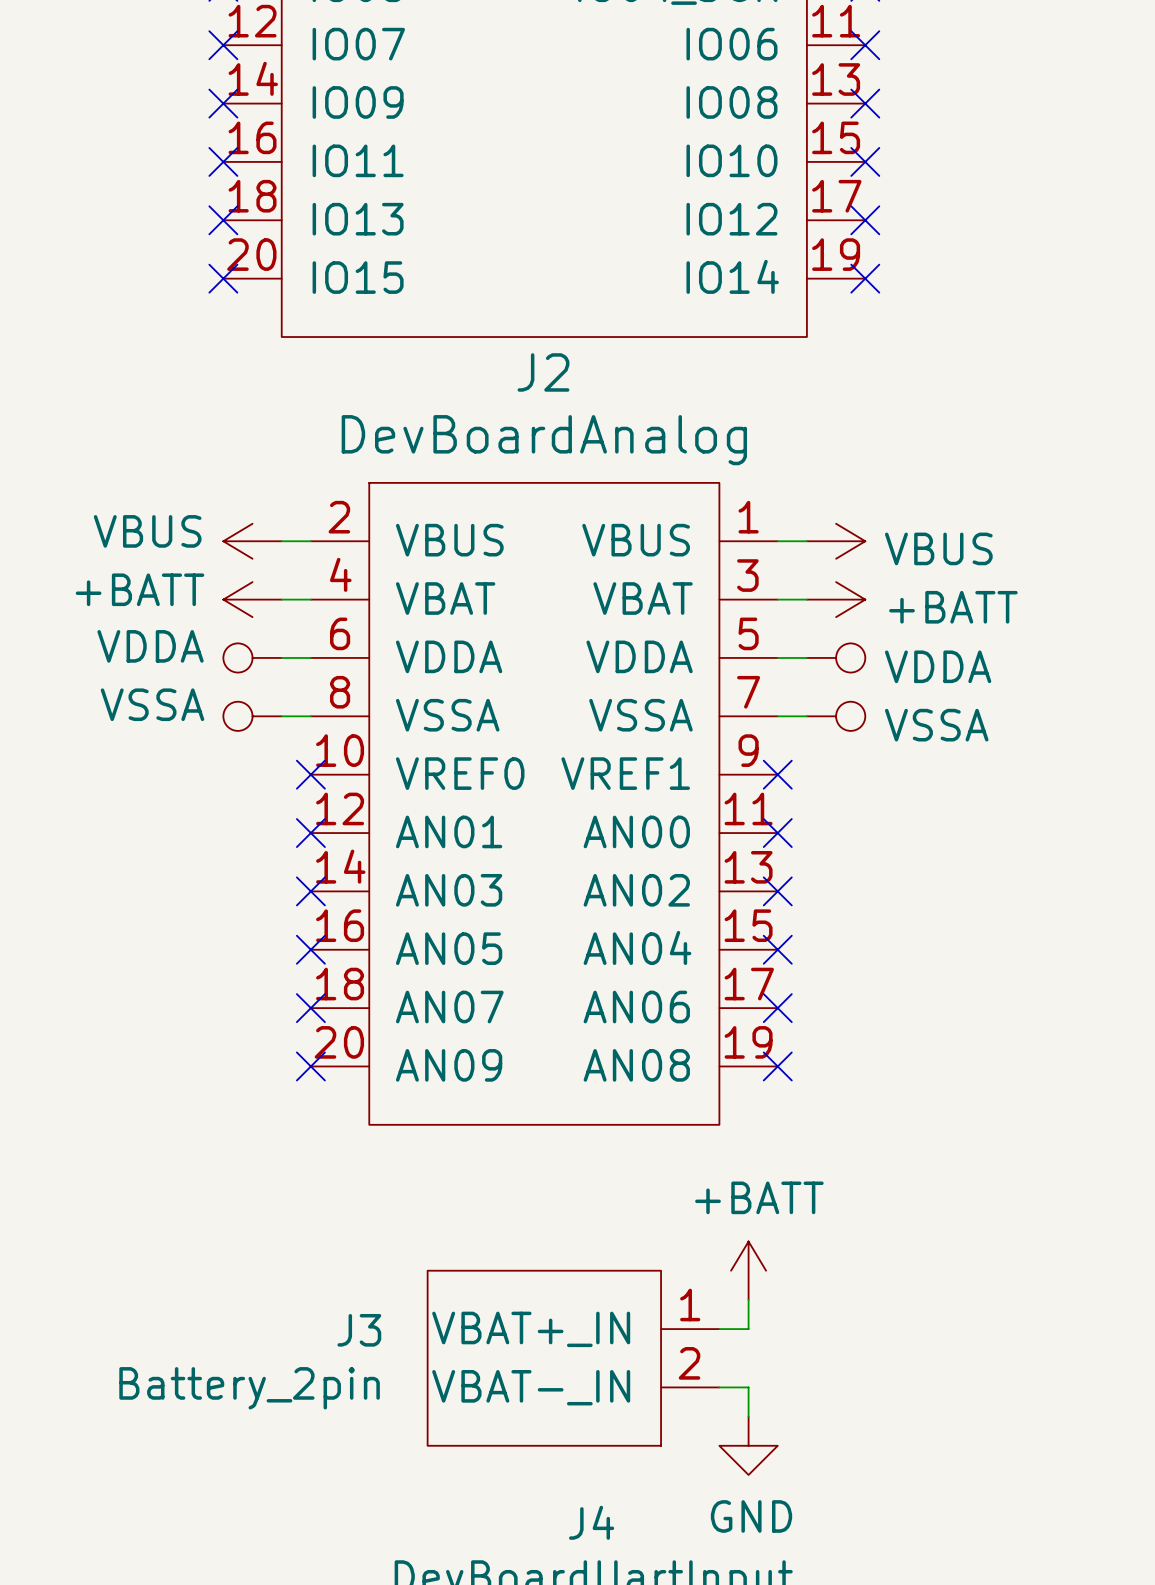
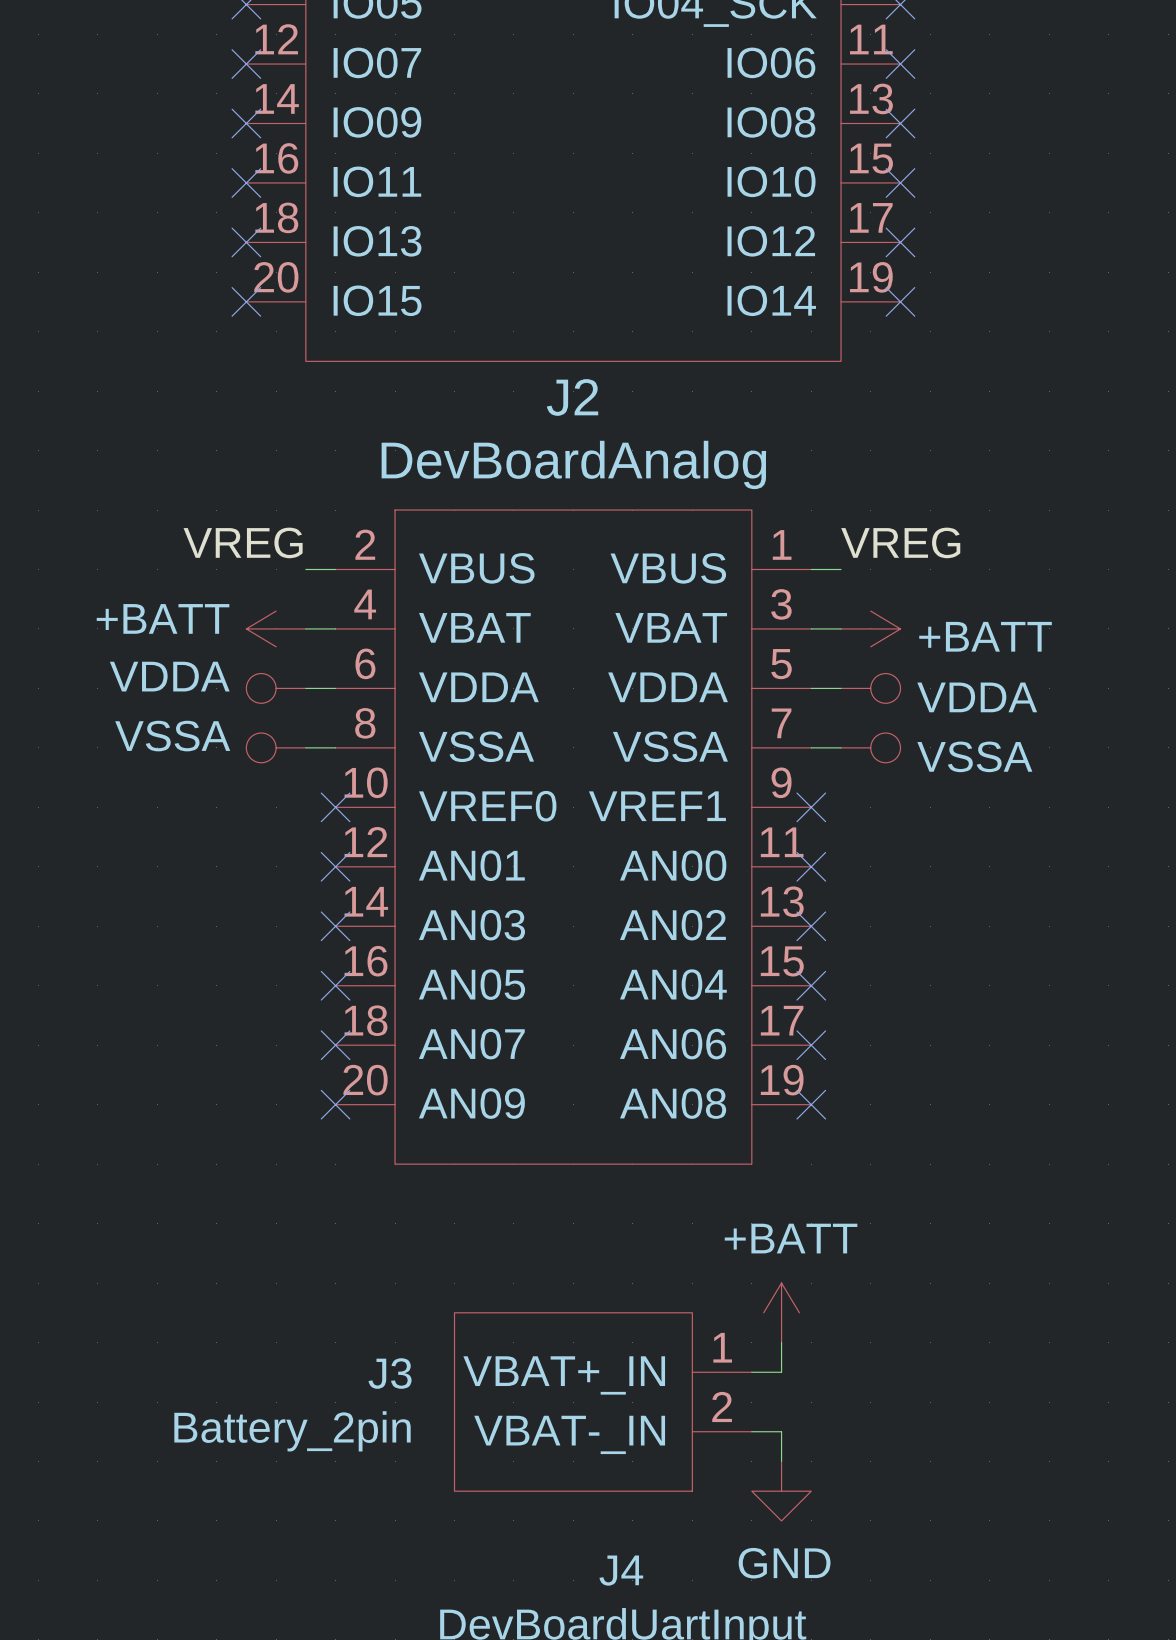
label: none -> VREG (243, 542)
label: none -> VREG (900, 542)
power symbol: VBUS (252, 541) -> none
power symbol: VBUS (836, 541) -> none

